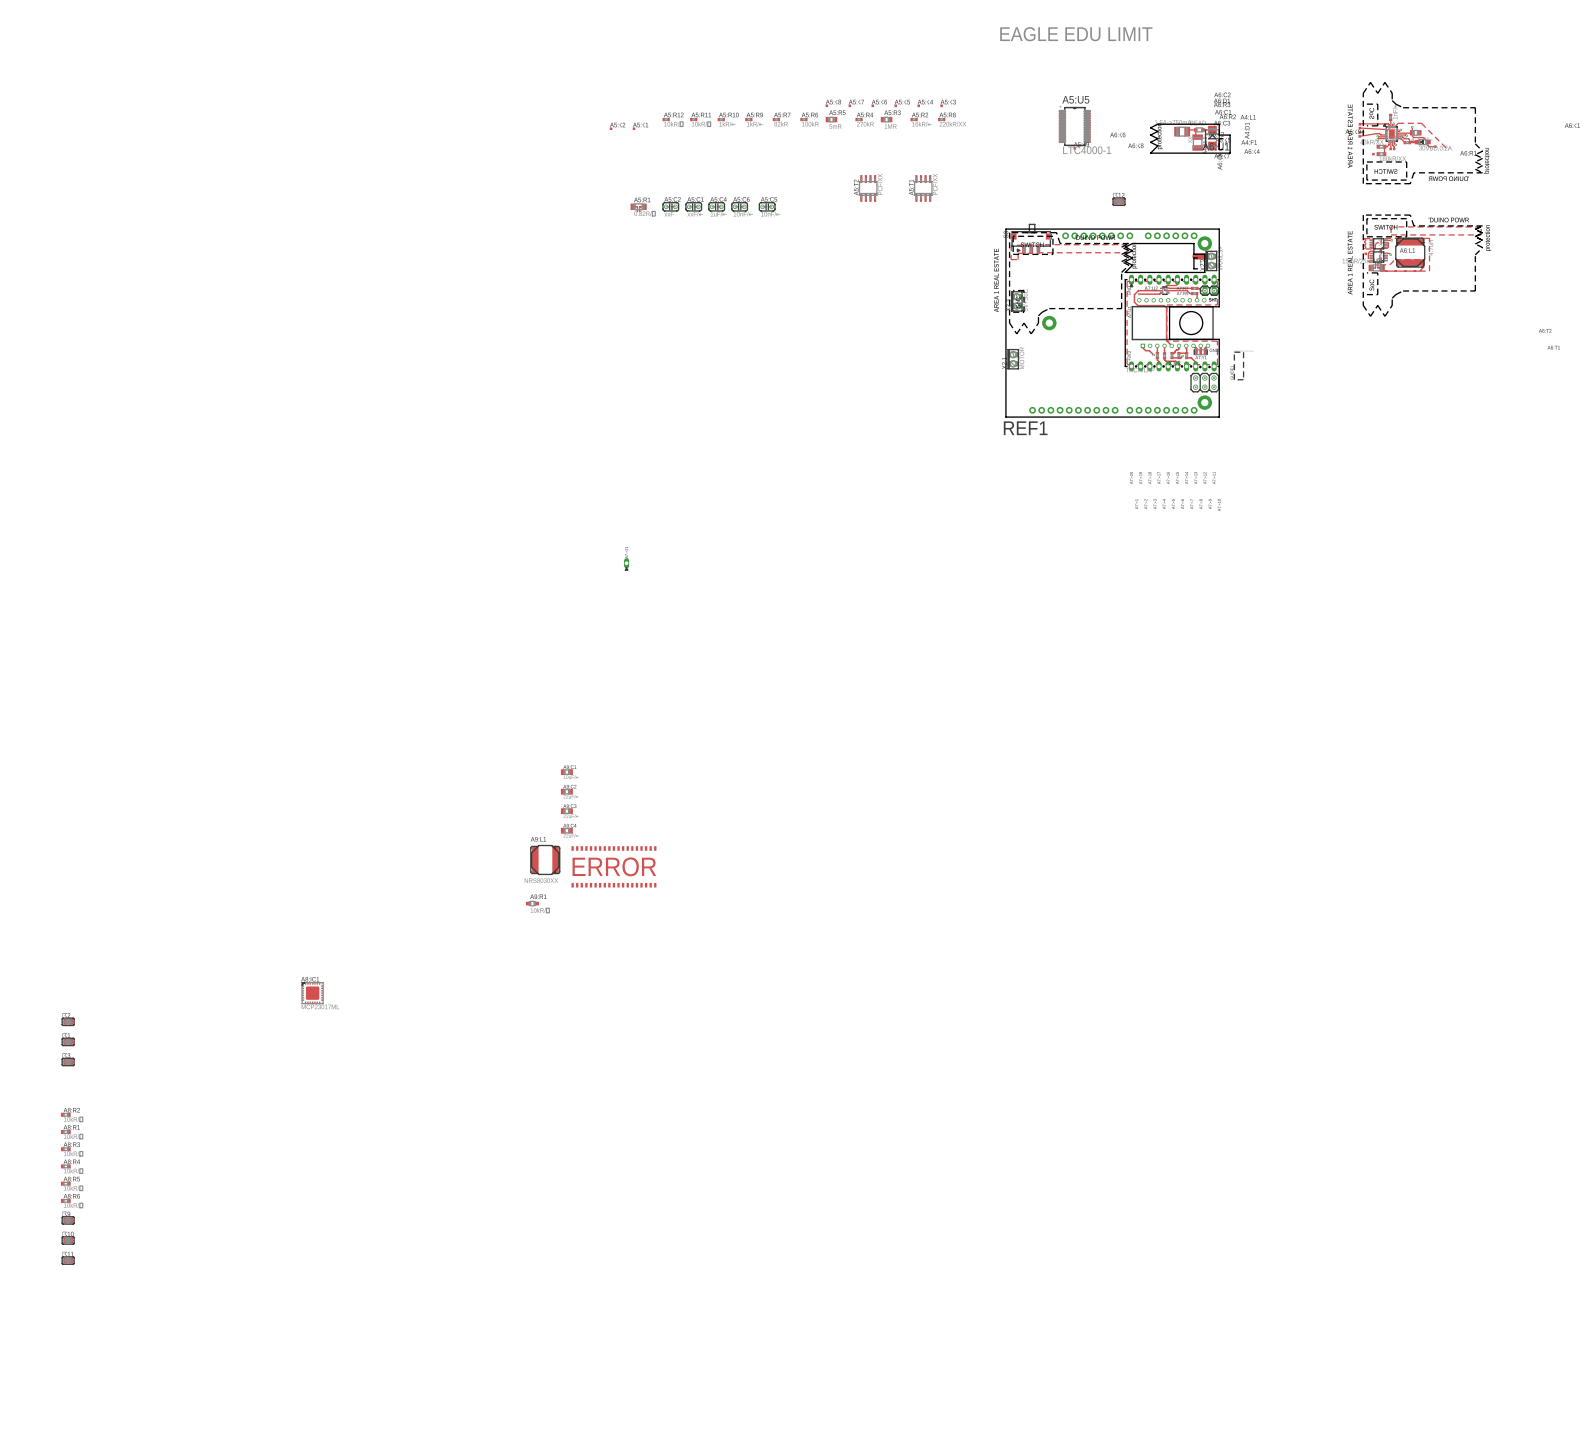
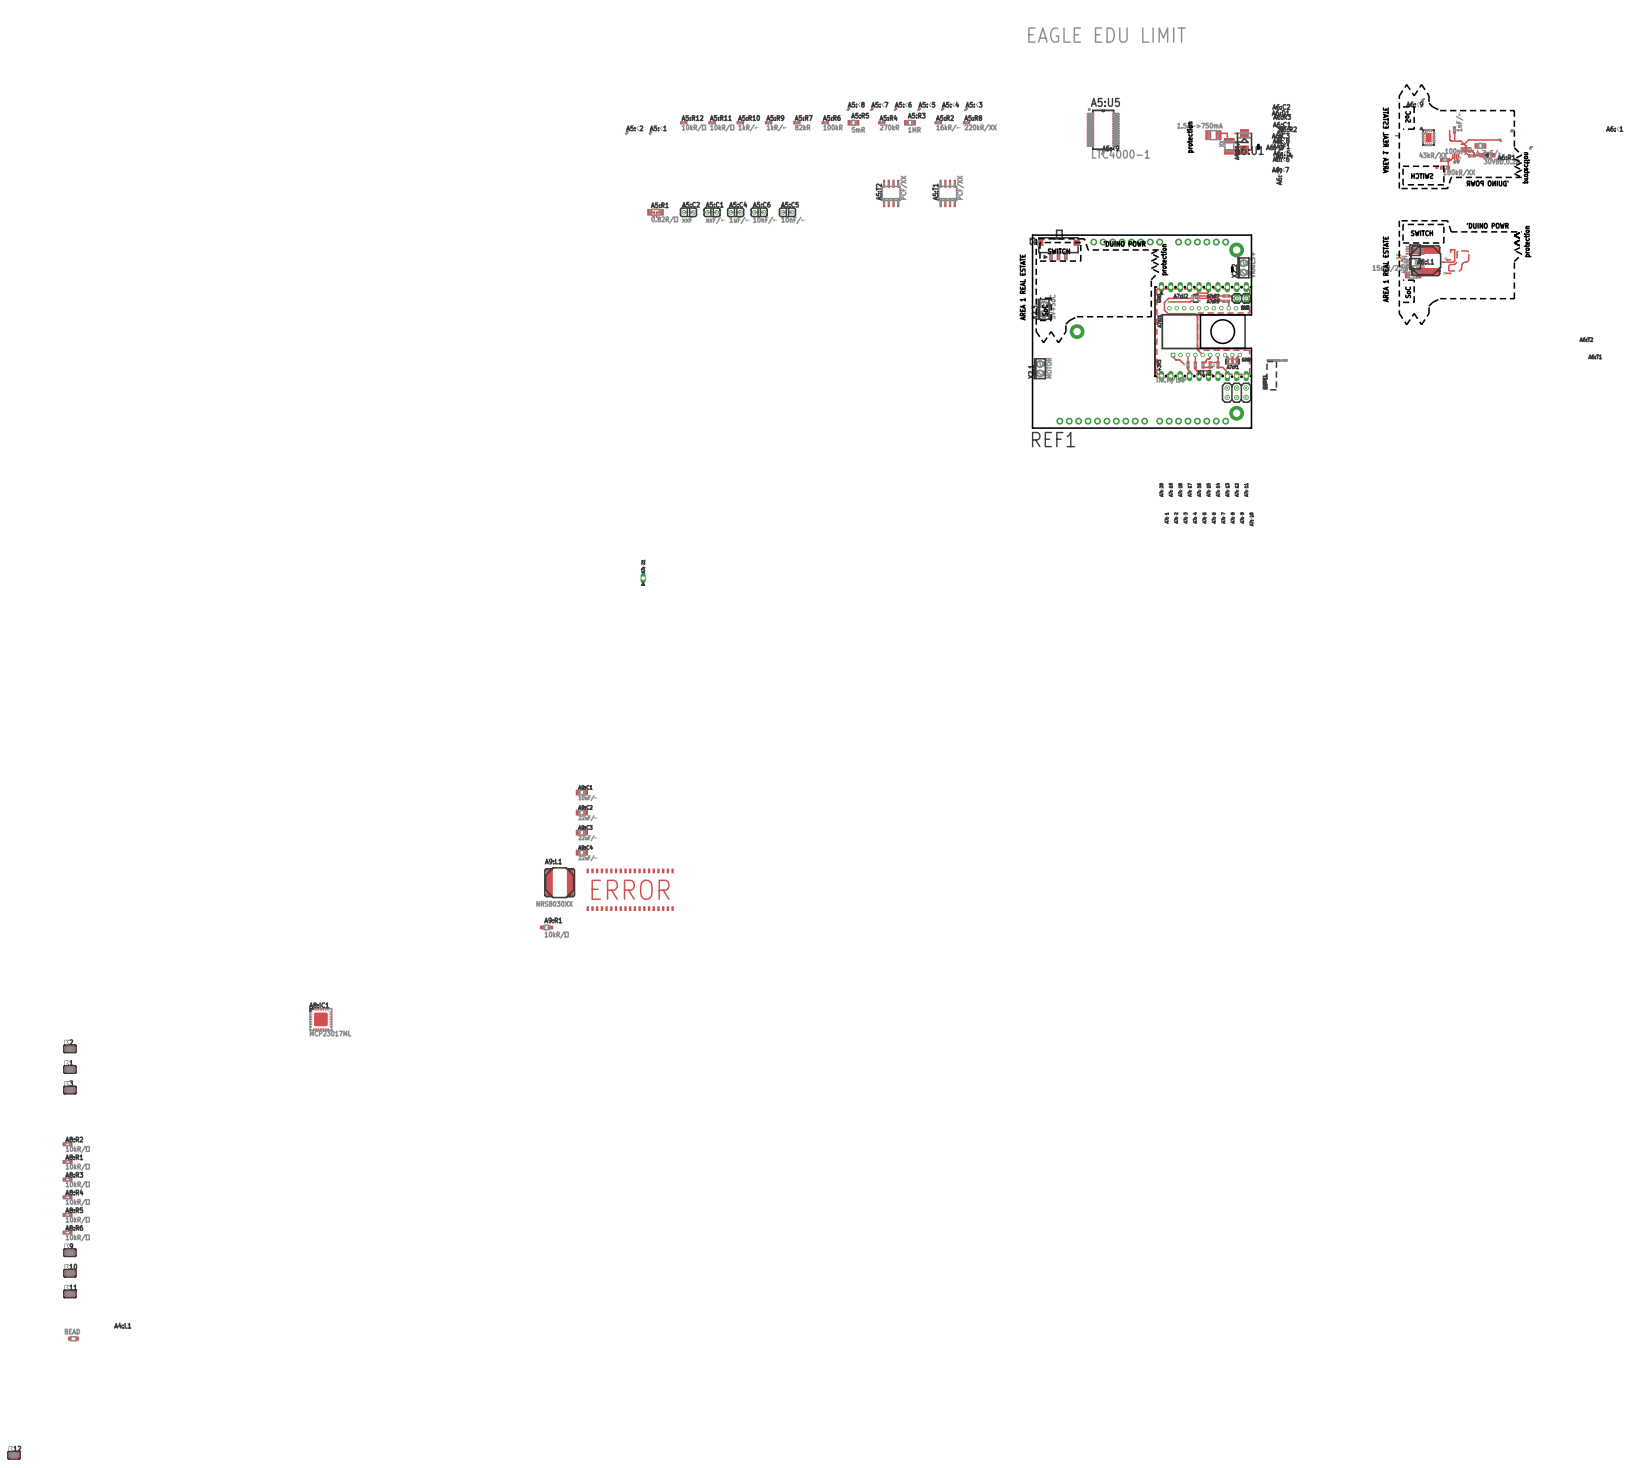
part position: (1390, 117) -> (1454, 129)
track: (1390, 119) (1390, 126) -> (1454, 132) (1454, 139)
track: (1393, 123) (1392, 126) -> none
via: (1393, 123) -> none
board edge: (1157, 124) (1219, 124) (1219, 135) (1230, 135) (1230, 153) (1150, 153) (1157, 145) (1150, 142) (1157, 138) (1150, 135) (1157, 131) (1150, 127) (1157, 124) -> none
track: (1359, 124) (1388, 123) (1389, 126) -> none
part position: (1359, 124) -> (1530, 148)
track: (1394, 127) (1398, 123) (1421, 123) (1448, 150) -> none
via: (1412, 127) -> none
track: (1359, 128) (1386, 129) -> none
part position: (1359, 128) -> (1422, 100)
part position: (1199, 129) -> (73, 1338)
track: (1400, 129) (1397, 131) -> none
via: (1400, 129) -> none
part position: (1359, 132) -> (1499, 139)
via: (1363, 132) -> none
track: (1412, 132) (1397, 133) -> none
part position: (1415, 132) -> (1480, 145)
track: (1386, 134) (1376, 133) (1359, 136) -> none
track: (1397, 134) (1406, 135) -> (1461, 147) (1470, 148)
via: (1406, 135) -> none
part position: (1359, 136) -> (1511, 131)
track: (1377, 136) (1386, 136) -> none
via: (1377, 136) -> none
track: (1397, 136) (1408, 138) (1409, 142) (1417, 142) -> (1461, 149) (1472, 151) (1473, 155) (1482, 155)
track: none -> (1499, 139) (1468, 139) (1464, 144) (1461, 144)
board edge: (1222, 138) (1219, 138) (1219, 149) (1222, 149) -> none
track: (1386, 138) (1377, 139) -> none
track: (1397, 138) (1400, 138) (1404, 142) -> (1461, 151) (1464, 151) (1469, 155)
via: (1377, 139) -> none
track: (1389, 141) (1389, 144) (1384, 146) (1384, 154) -> (1452, 154) (1452, 158) (1448, 159) (1448, 167)
track: (1390, 141) (1390, 148) -> (1454, 154) (1454, 162)
track: (1392, 141) (1394, 148) -> (1456, 154) (1458, 162)
track: (1394, 141) (1395, 144) -> (1458, 154) (1459, 158)
part position: (1407, 142) -> (1471, 155)
part position: (1422, 142) -> (1487, 155)
via: (1395, 144) -> none
via: none -> (1470, 148)
part position: (1381, 146) -> (1445, 159)
part position: (1435, 146) -> (1500, 159)
part position: (1390, 148) -> (1454, 162)
part position: (1394, 148) -> (1458, 162)
part position: (1373, 154) -> (1436, 167)
part position: (1381, 154) -> (1445, 167)
via: none -> (1459, 158)
part position: (1119, 201) -> (13, 1455)
zone outline: (1391, 226) (1391, 234) (1481, 234) (1481, 226) (1391, 226) -> none
zone outline: (1364, 238) (1372, 239) (1371, 248) (1364, 248) (1366, 247) (1364, 238) -> none
track: (1386, 240) (1391, 240) -> none
via: (1391, 240) -> none
zone outline: (1376, 242) (1388, 242) (1388, 247) (1379, 250) (1378, 262) (1369, 262) (1368, 252) (1375, 248) (1376, 242) -> none
board edge: (1132, 243) (1193, 243) (1193, 254) (1204, 254) (1204, 272) (1125, 272) (1132, 265) (1125, 261) (1132, 257) (1125, 254) (1132, 250) (1125, 247) (1132, 243) -> none
zone outline: (1037, 244) (1037, 252) (1127, 252) (1127, 244) (1037, 244) -> none
zone outline: none -> (1458, 250) (1467, 250) (1468, 260) (1461, 264) (1459, 270) (1448, 270) (1448, 265) (1457, 262) (1458, 250)
zone outline: (1011, 245) (1011, 259) (1018, 259) (1018, 253) (1032, 253) (1032, 245) (1011, 245) -> none
track: none -> (1450, 252) (1450, 249) (1454, 249) (1454, 260) (1441, 262)
track: none -> (1397, 254) (1400, 255)
via: none -> (1397, 254)
via: none -> (1397, 258)
track: none -> (1401, 257) (1397, 258)
track: none -> (1445, 258) (1450, 259)
via: none -> (1445, 258)
part rotation: 0° (1410, 252) -> 180° (1425, 260)
part position: (1410, 252) -> (1425, 260)
track: (1386, 253) (1390, 254) -> none
via: (1390, 254) -> none
track: (1195, 256) (1211, 256) -> none
board edge: (1197, 257) (1193, 257) (1193, 268) (1197, 268) -> none
track: none -> (1444, 273) (1450, 273)
via: none -> (1444, 273)
zone outline: (1381, 271) (1381, 238) (1429, 238) (1429, 271) (1380, 271) (1380, 264) (1389, 264) (1395, 259) (1424, 259) (1424, 266) (1419, 271) -> none

